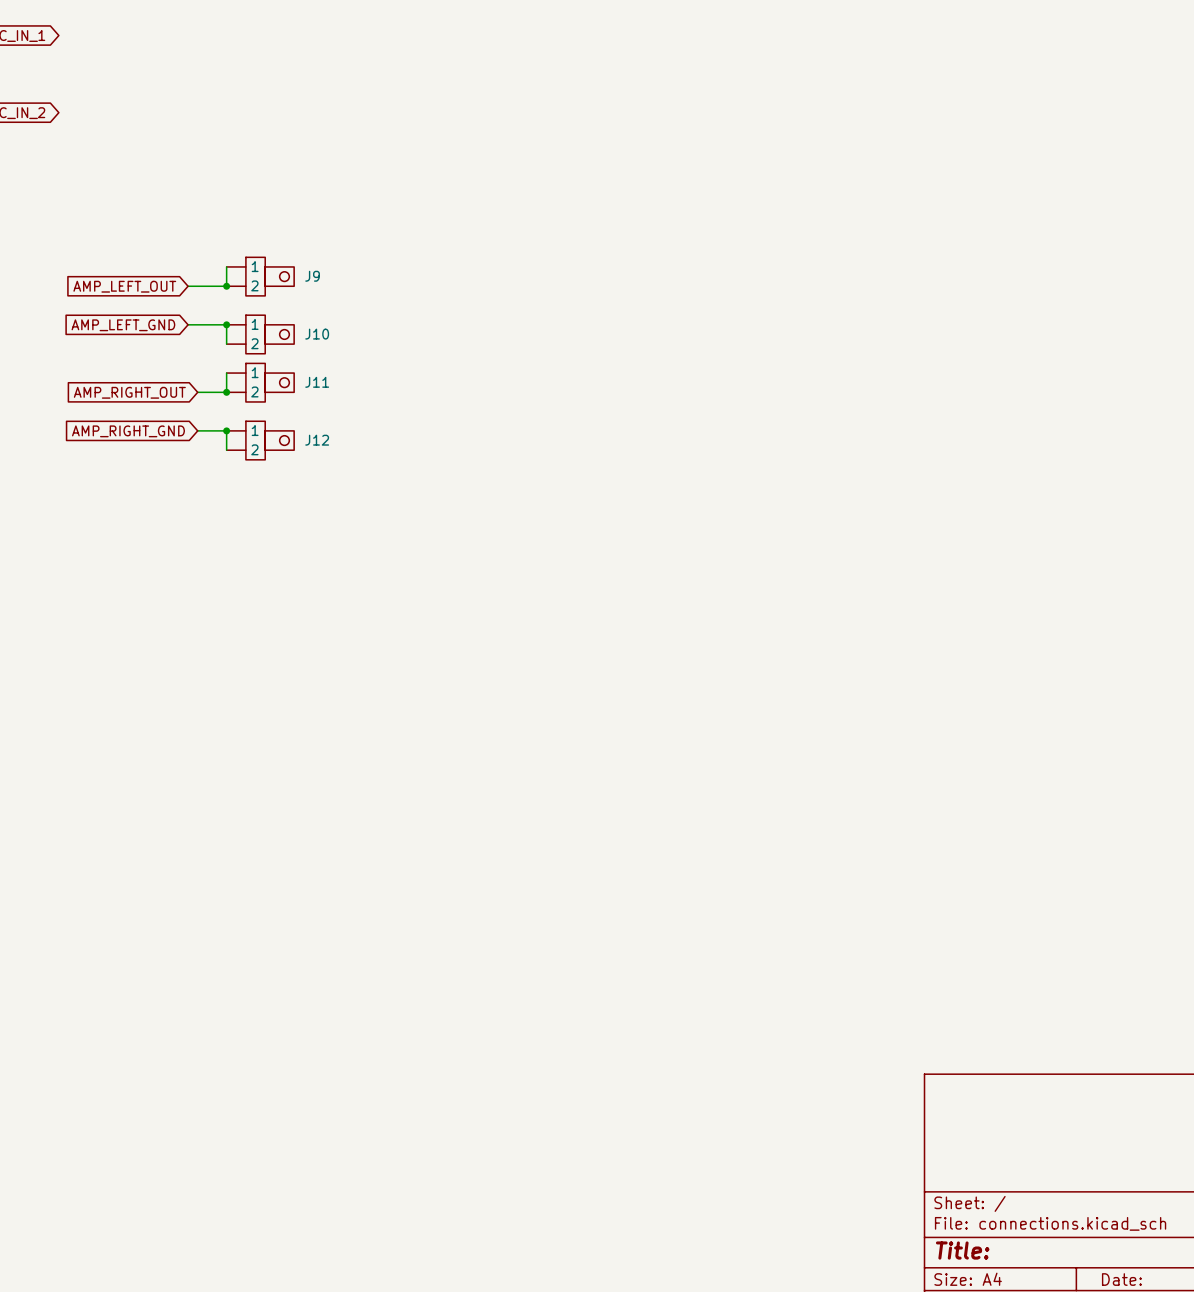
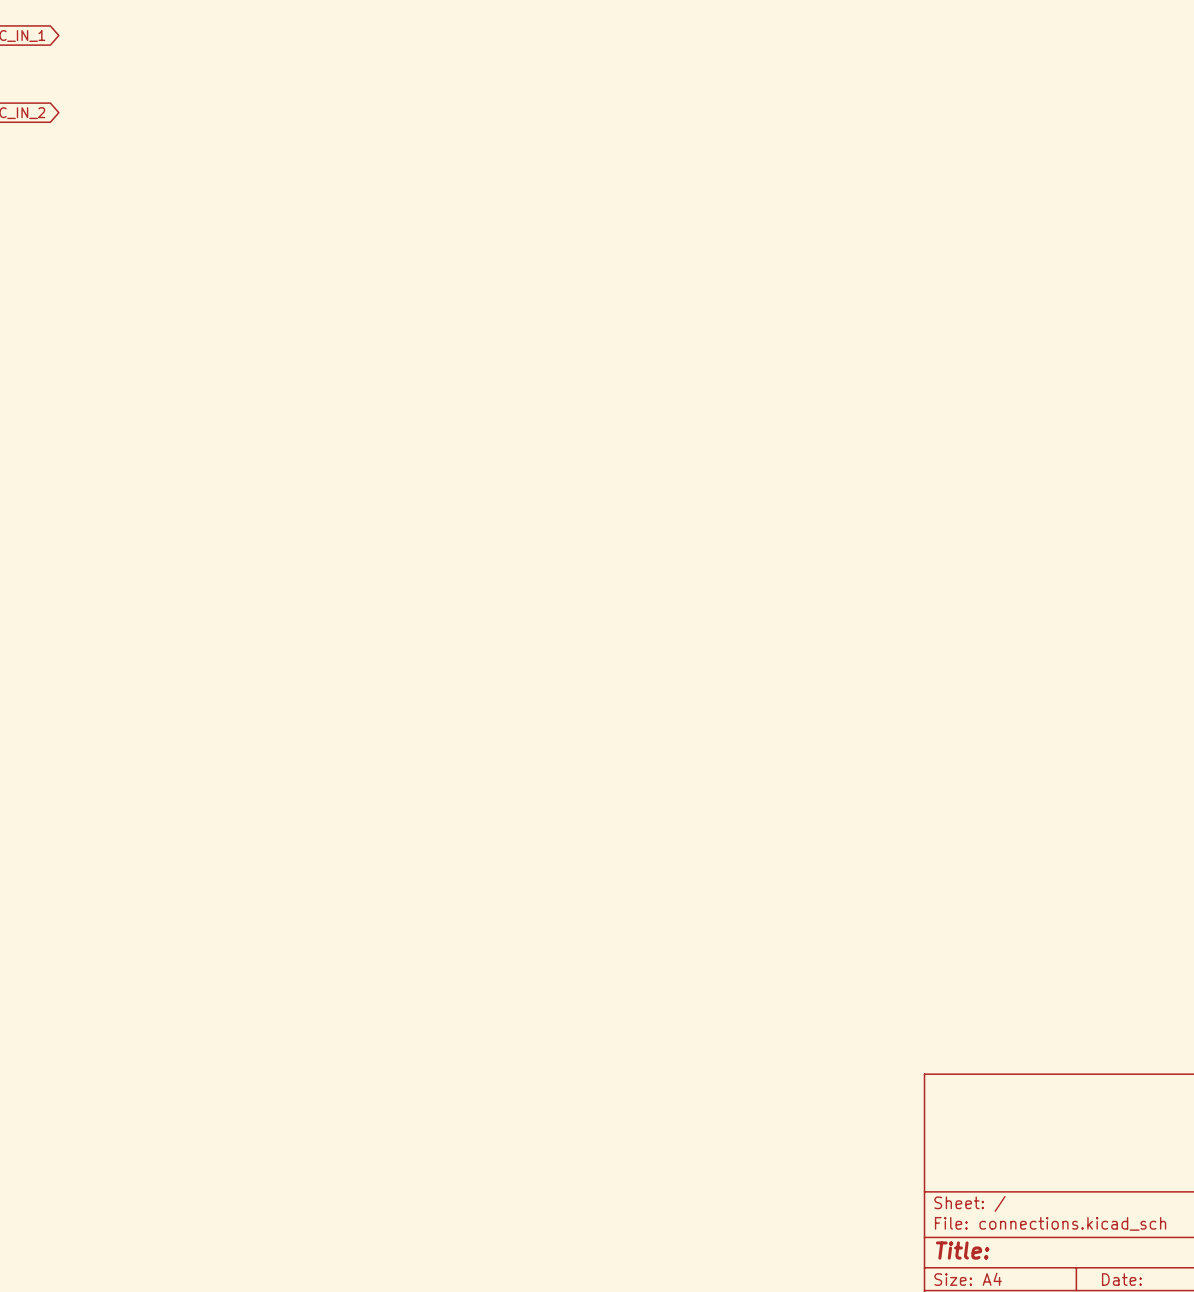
wire: (226, 266) (226, 286) (188, 286) -> none
J9: (260, 276) -> none
global label: AMP_LEFT_OUT (124, 286) -> none
junction: (226, 286) -> none
wire: (188, 324) (226, 324) (226, 344) -> none
junction: (226, 324) -> none
global label: AMP_LEFT_GND (123, 325) -> none
J10: (260, 334) -> none
wire: (226, 373) (226, 392) (197, 392) -> none
J11: (260, 382) -> none
global label: AMP_RIGHT_OUT (129, 392) -> none
junction: (226, 392) -> none
wire: (197, 430) (226, 430) (226, 450) -> none
junction: (226, 430) -> none
global label: AMP_RIGHT_GND (128, 431) -> none
J12: (260, 440) -> none

